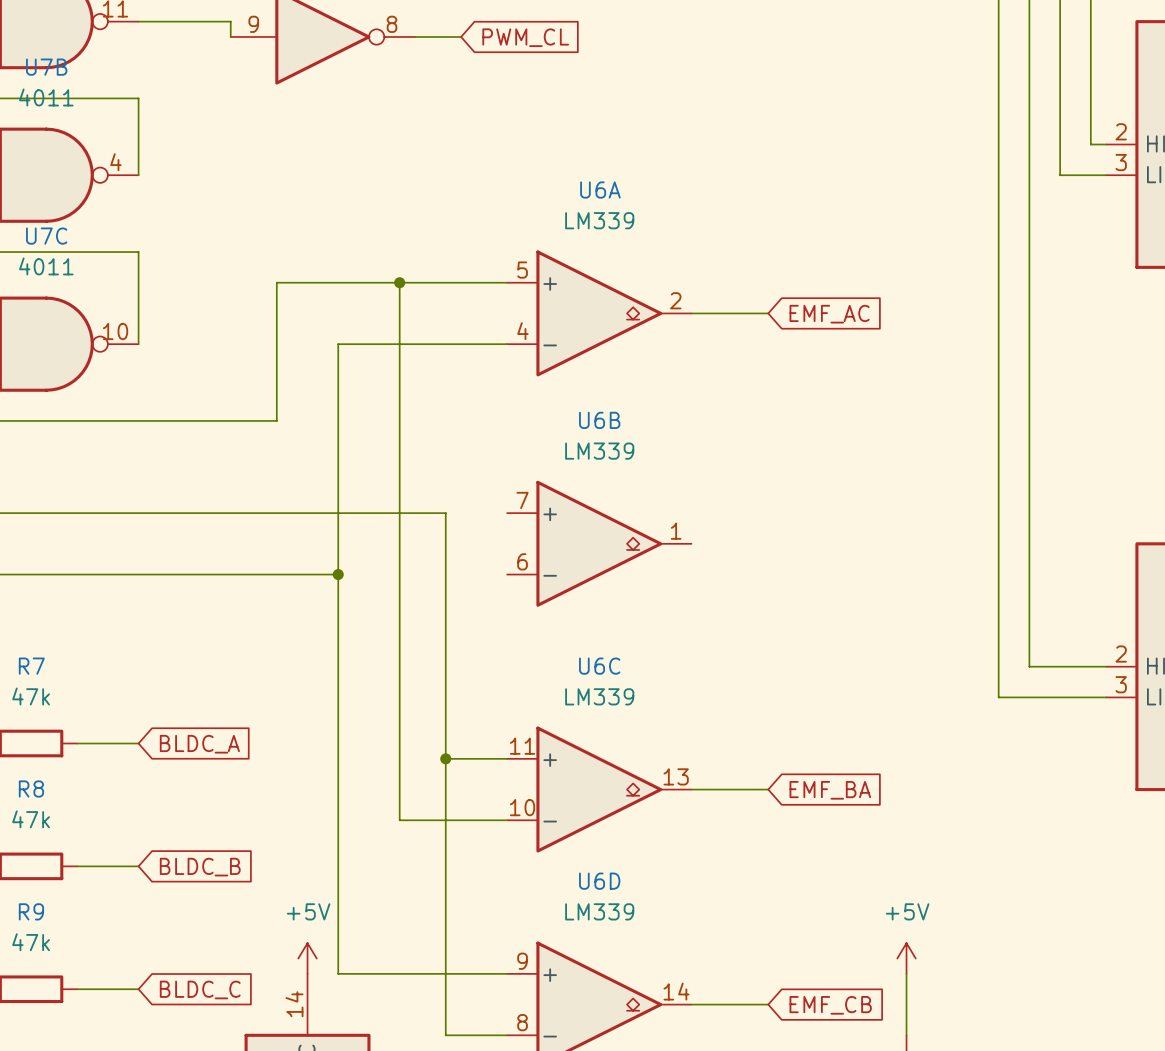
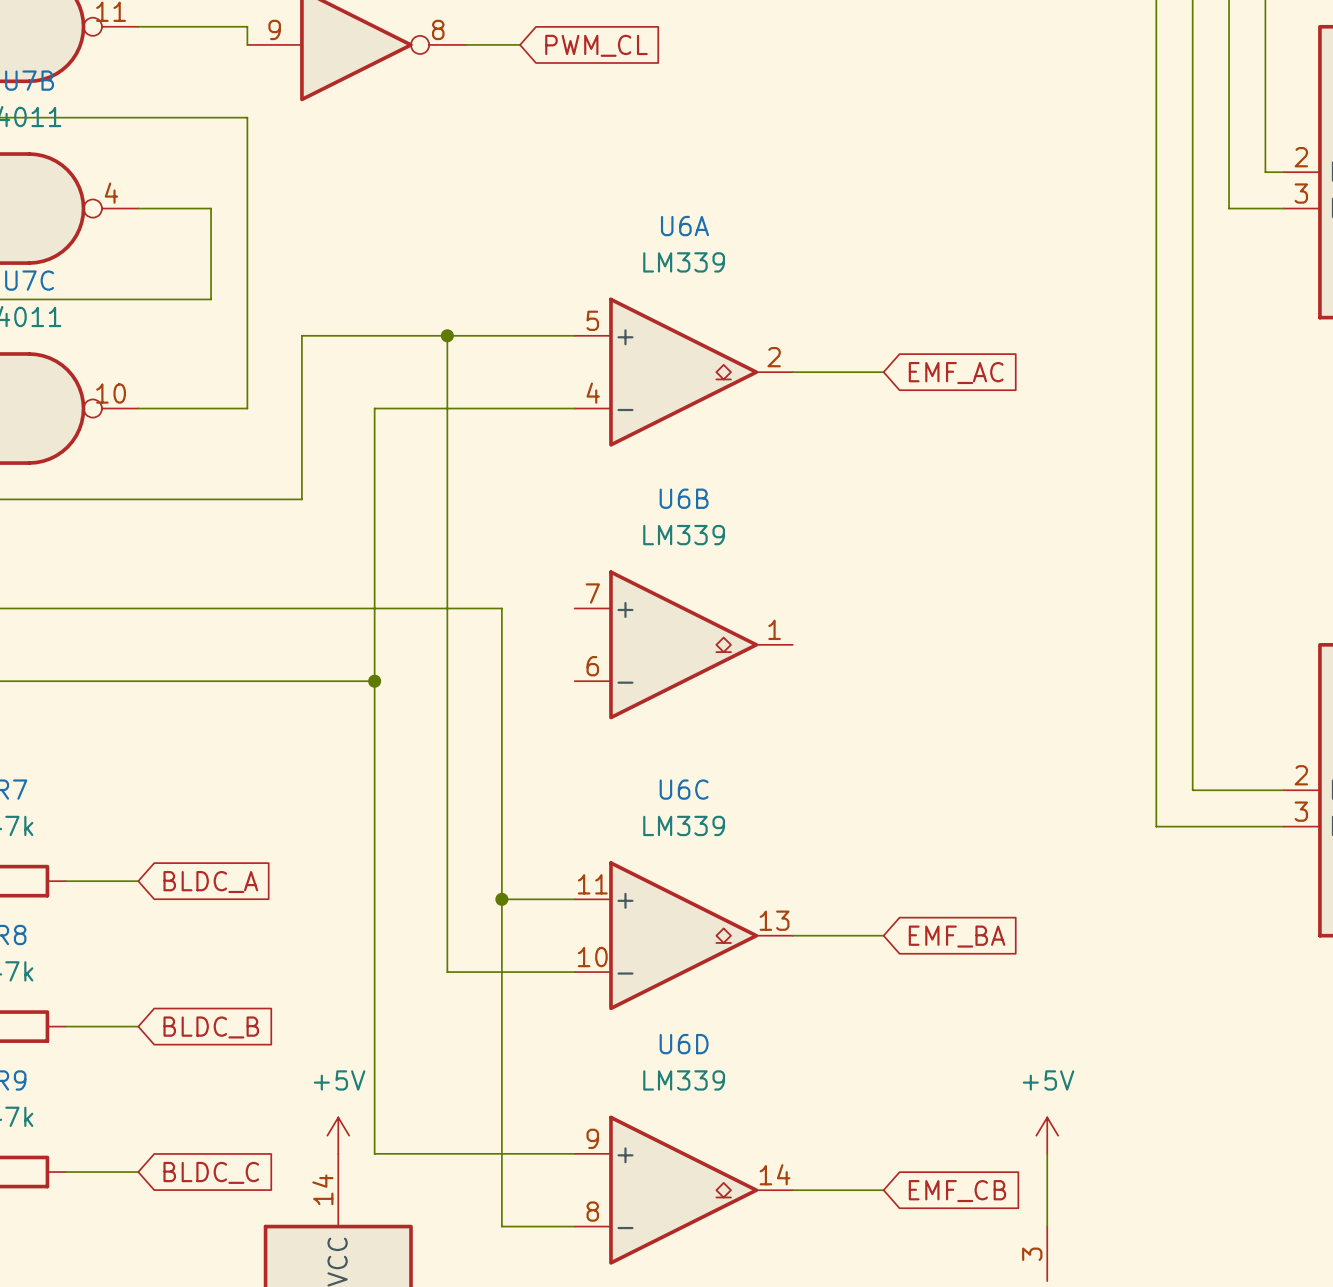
wire: (138, 98) (138, 175) -> (138, 299) (211, 299) (211, 208) (138, 208)
wire: (138, 252) (138, 344) -> (138, 117) (247, 117) (247, 408) (138, 408)

